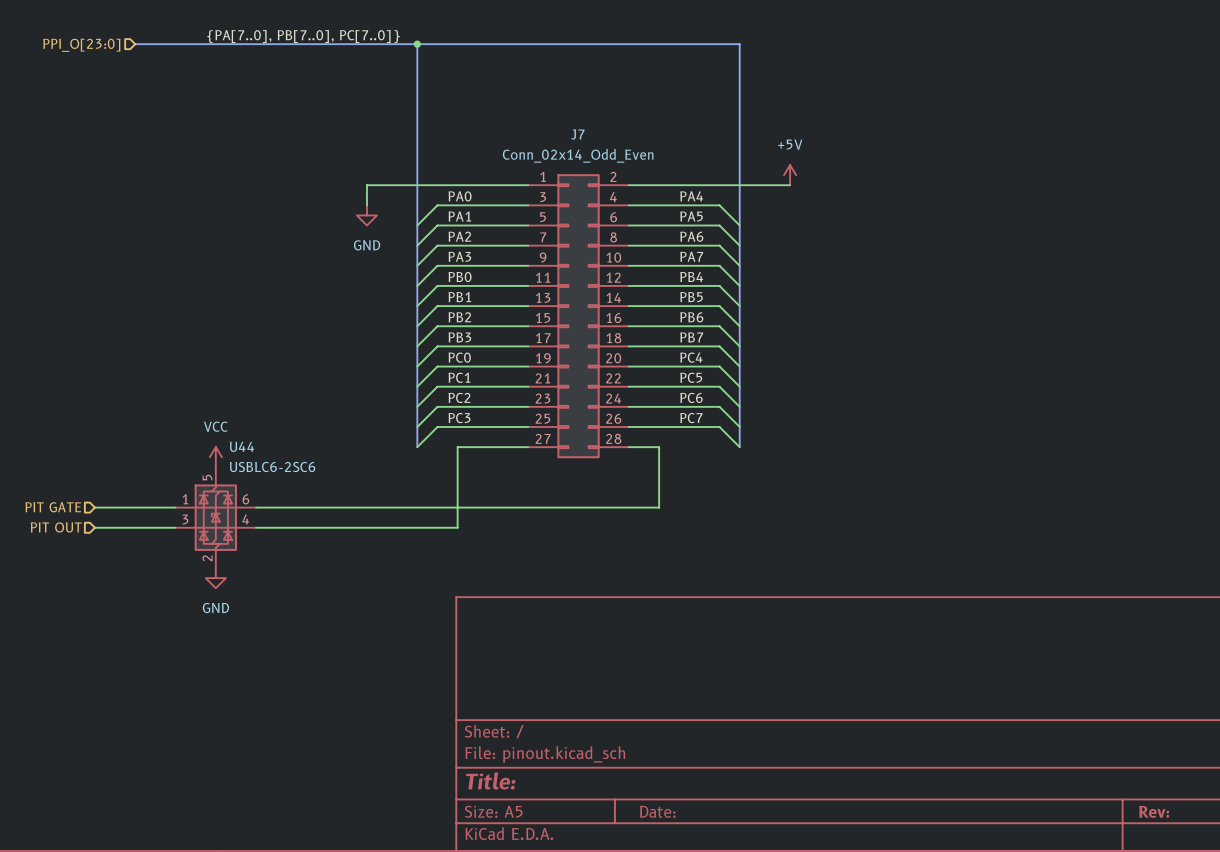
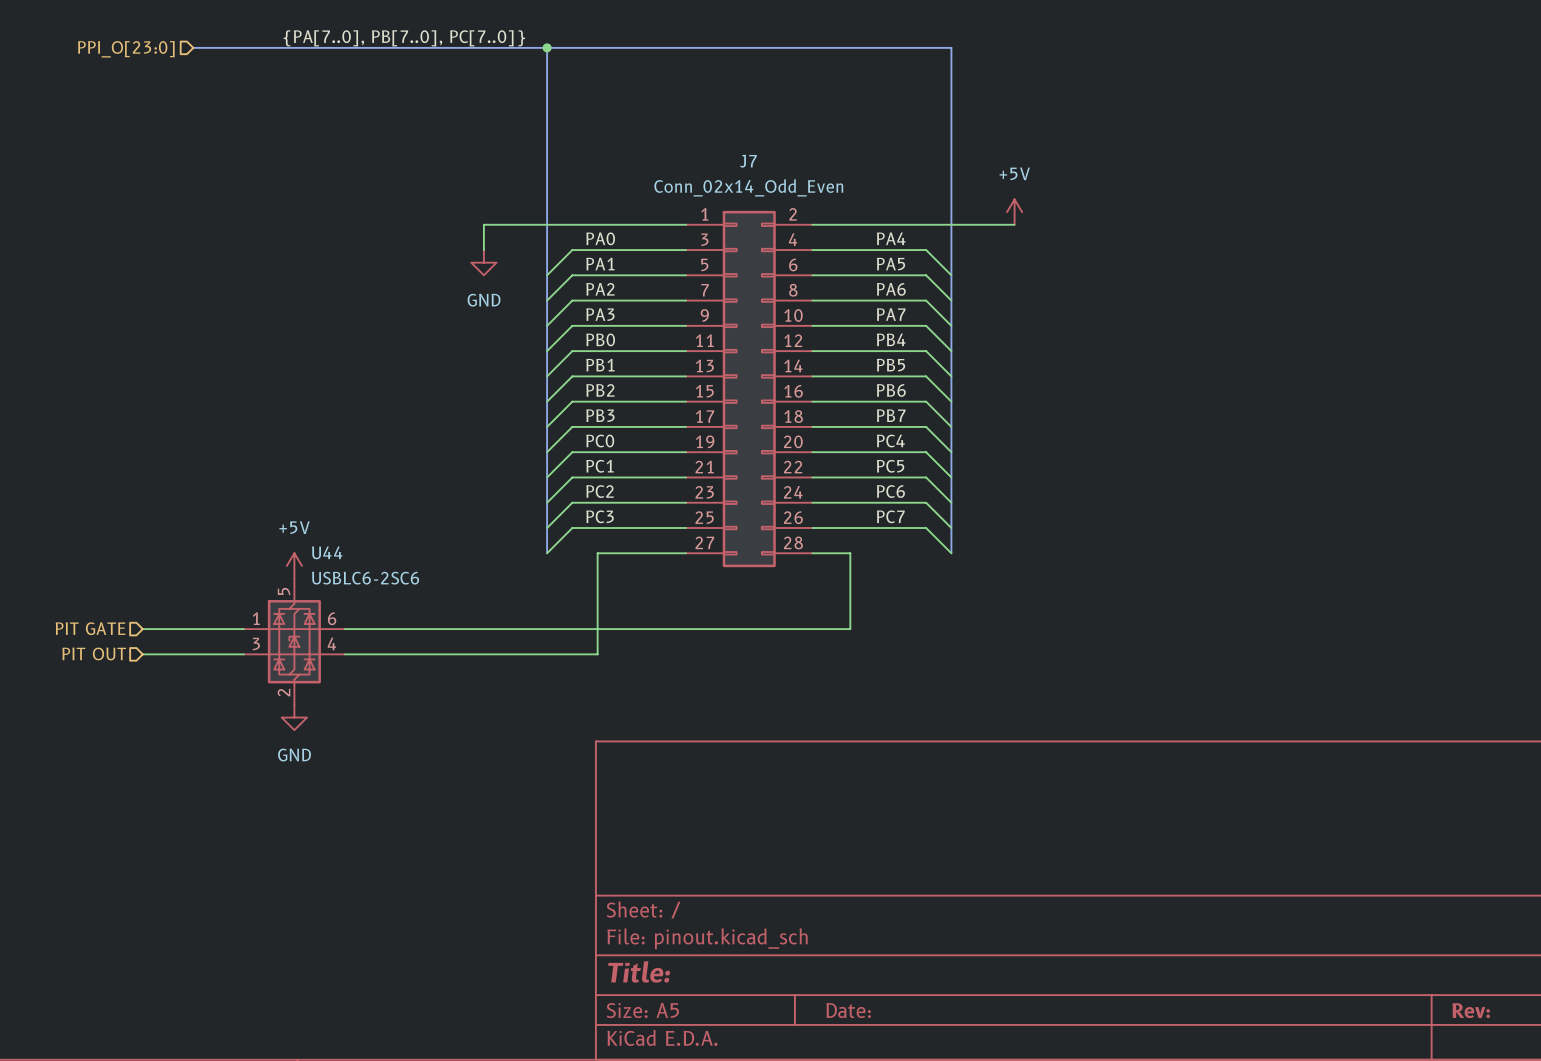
power symbol: VCC (215, 457) -> +5V (294, 565)

